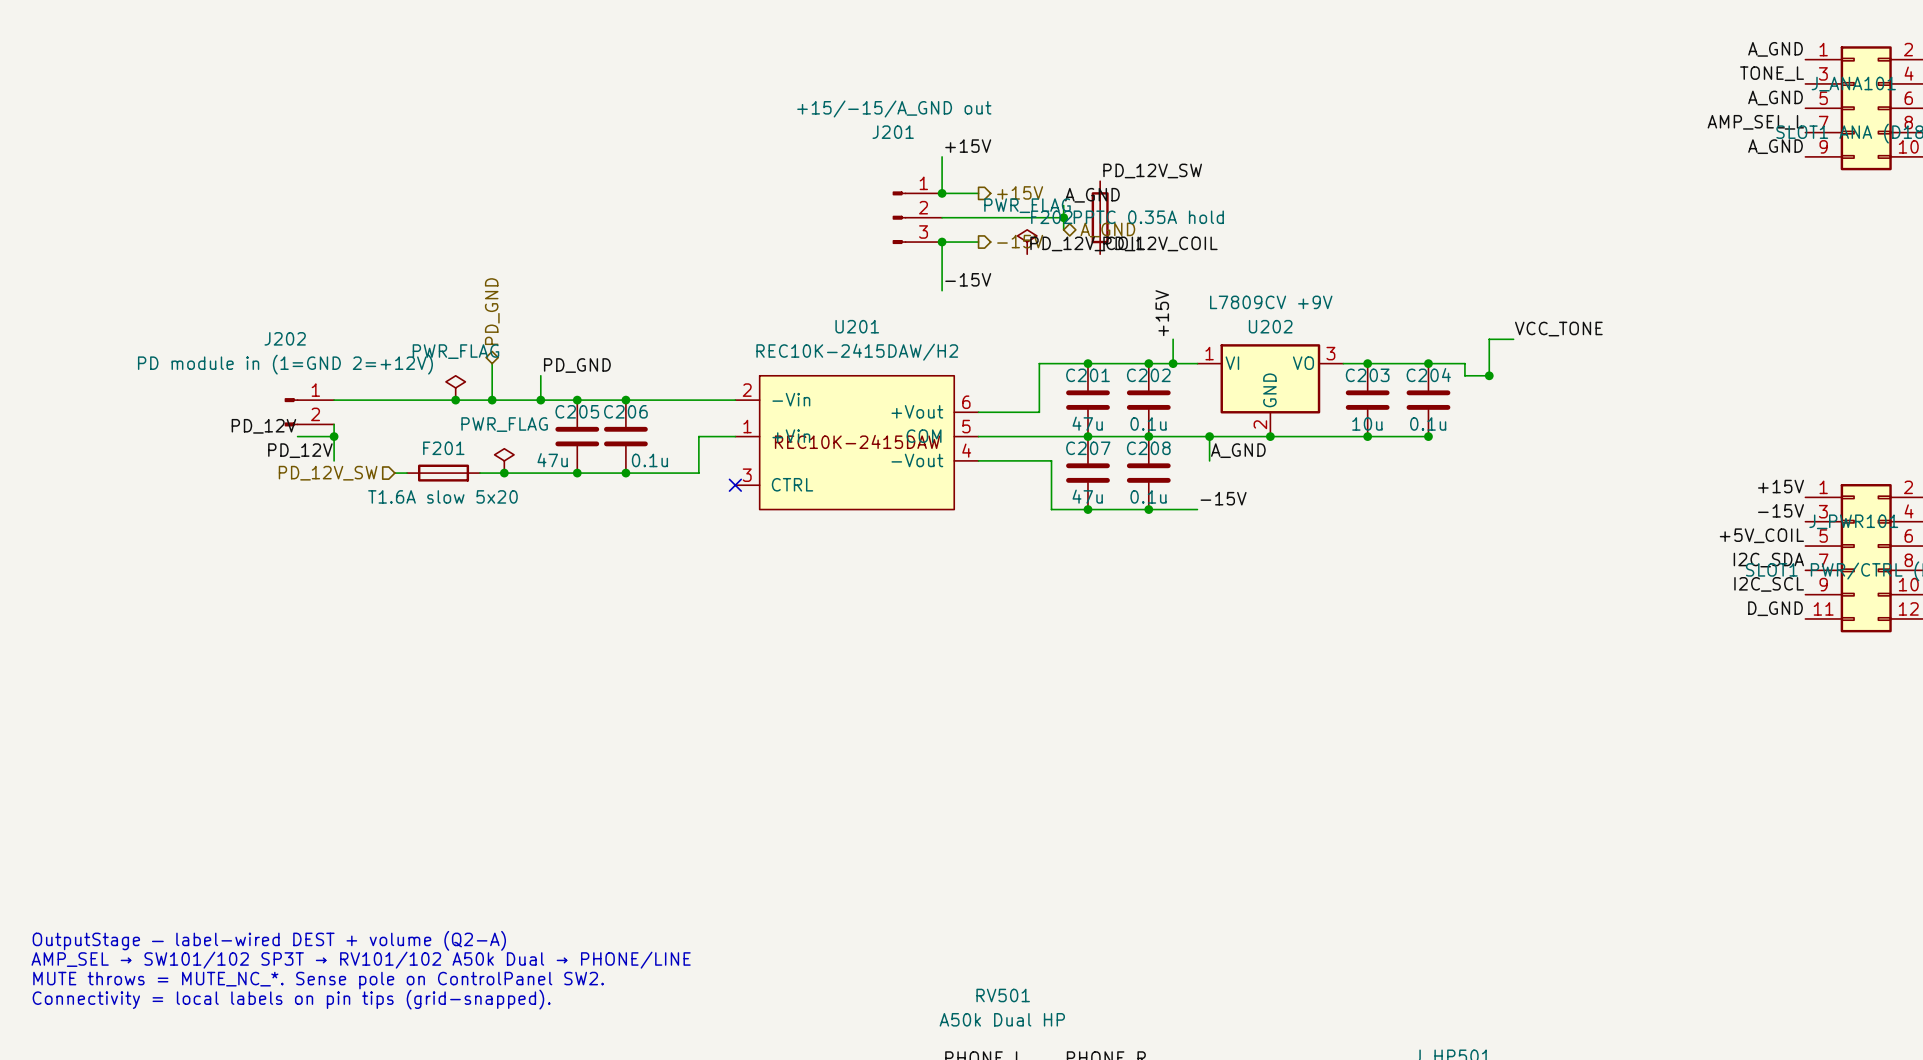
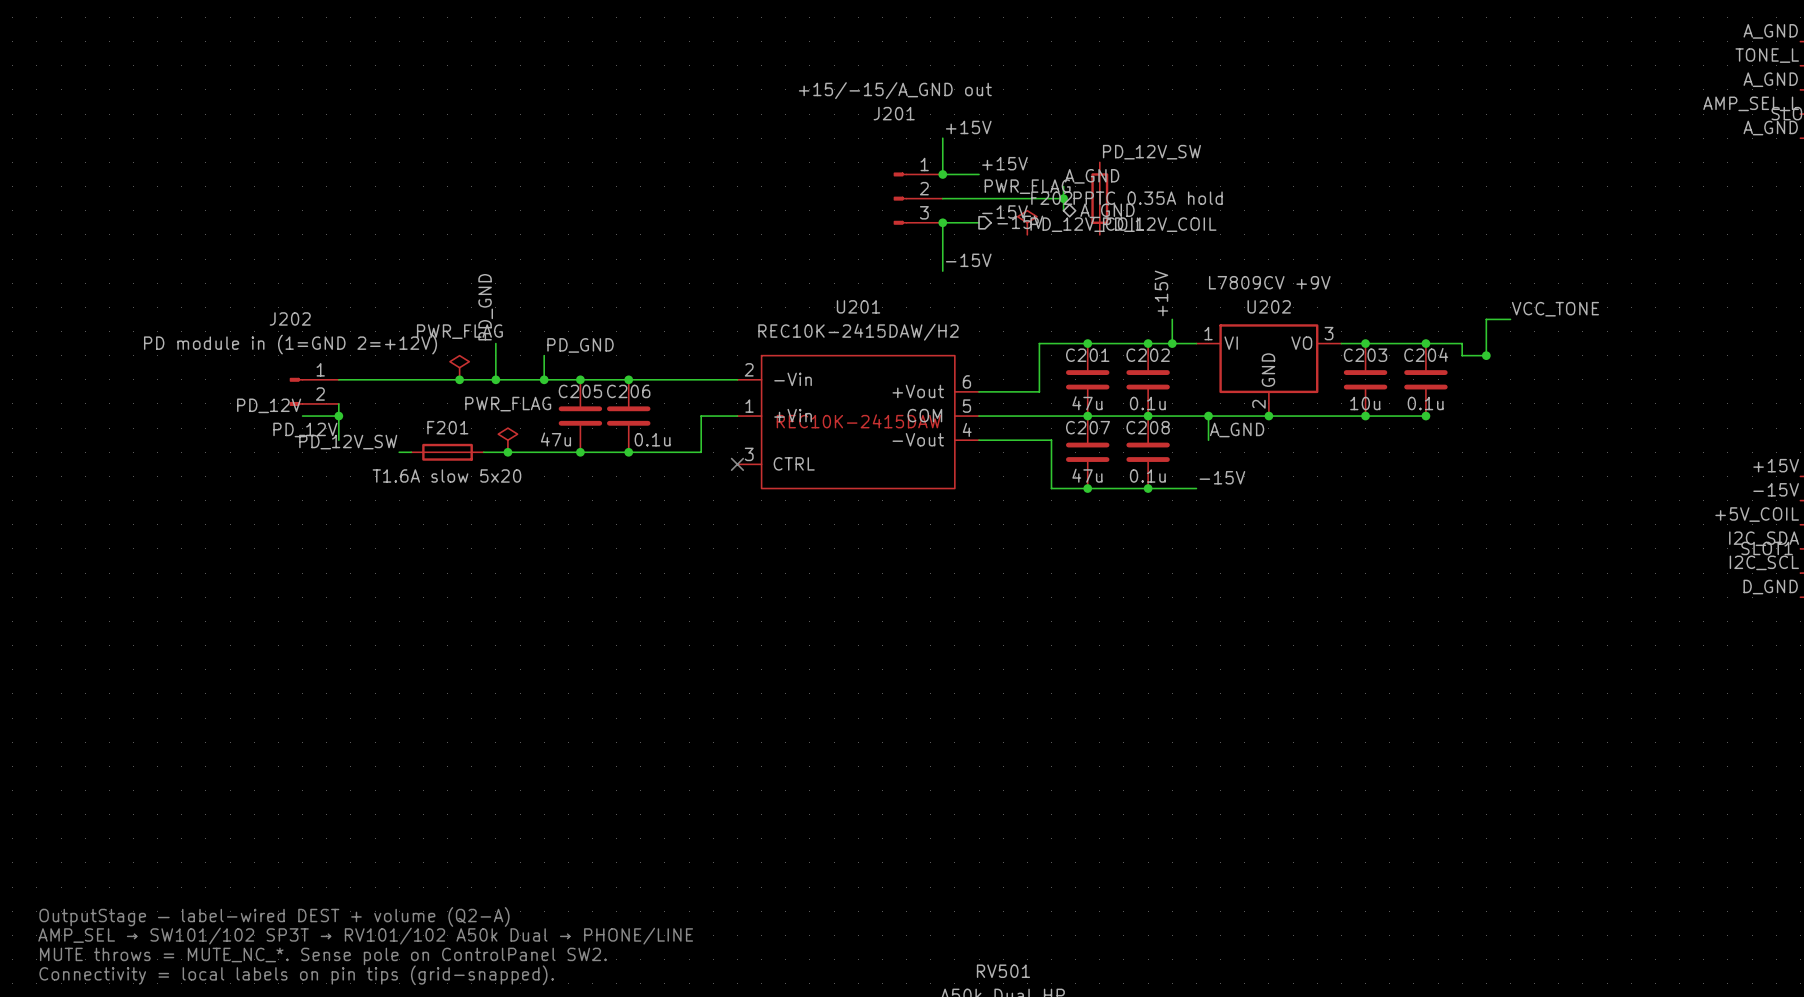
label: none -> +15V (1004, 163)
hierarchical label: +15V (1020, 192) -> none
label: none -> -15V (1004, 212)
hierarchical label: PD_GND (492, 311) -> none
label: none -> PD_GND (485, 307)
label: none -> PD_12V_SW (348, 442)
hierarchical label: PD_12V_SW (328, 473) -> none

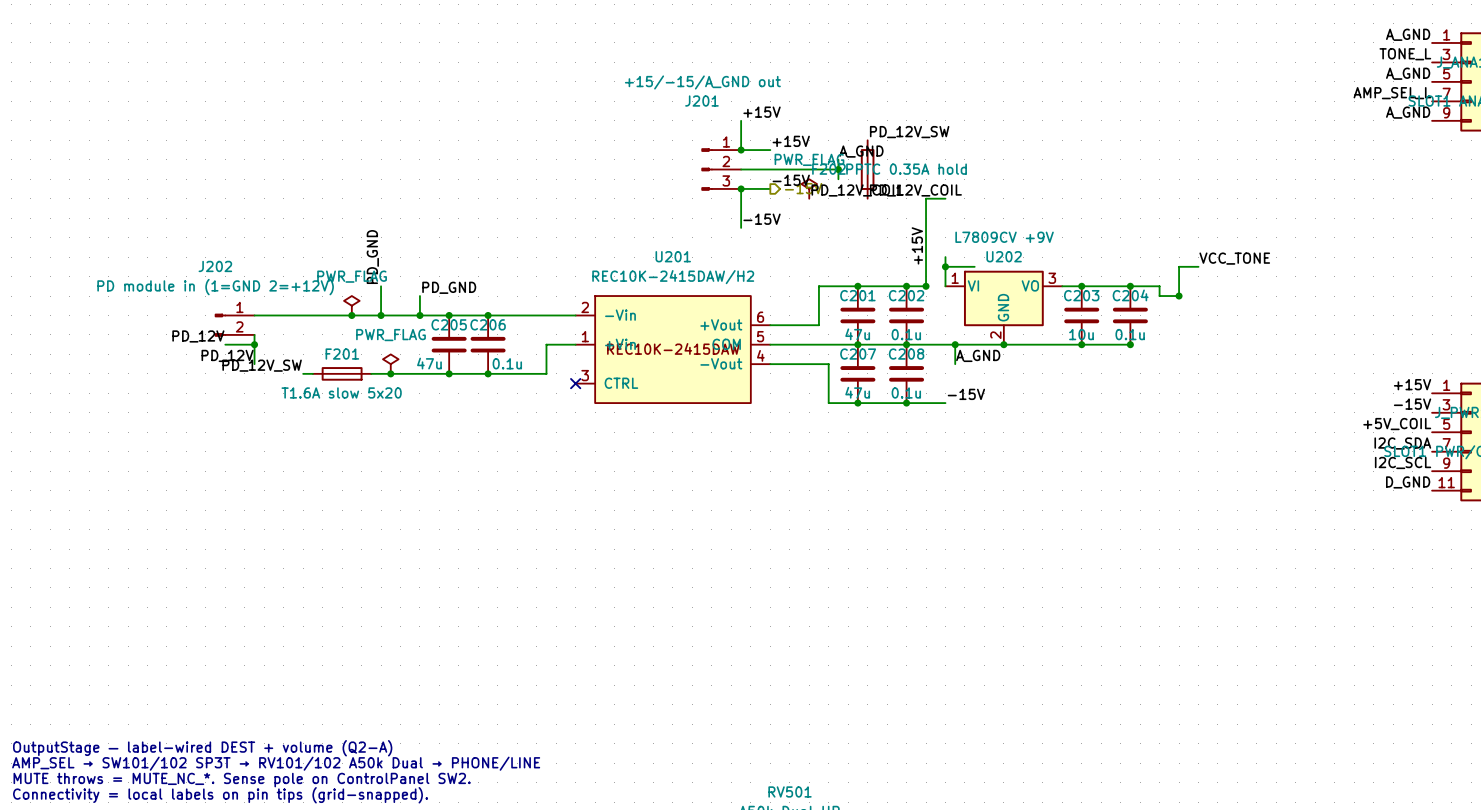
hierarchical label: A_GND (1107, 210) -> none
wire: none -> (945, 198) (926, 198) (926, 266)
wire: none -> (945, 266) (974, 266)
junction: none -> (945, 266)
wire: (1172, 343) (1196, 343) -> (945, 257) (945, 286)

